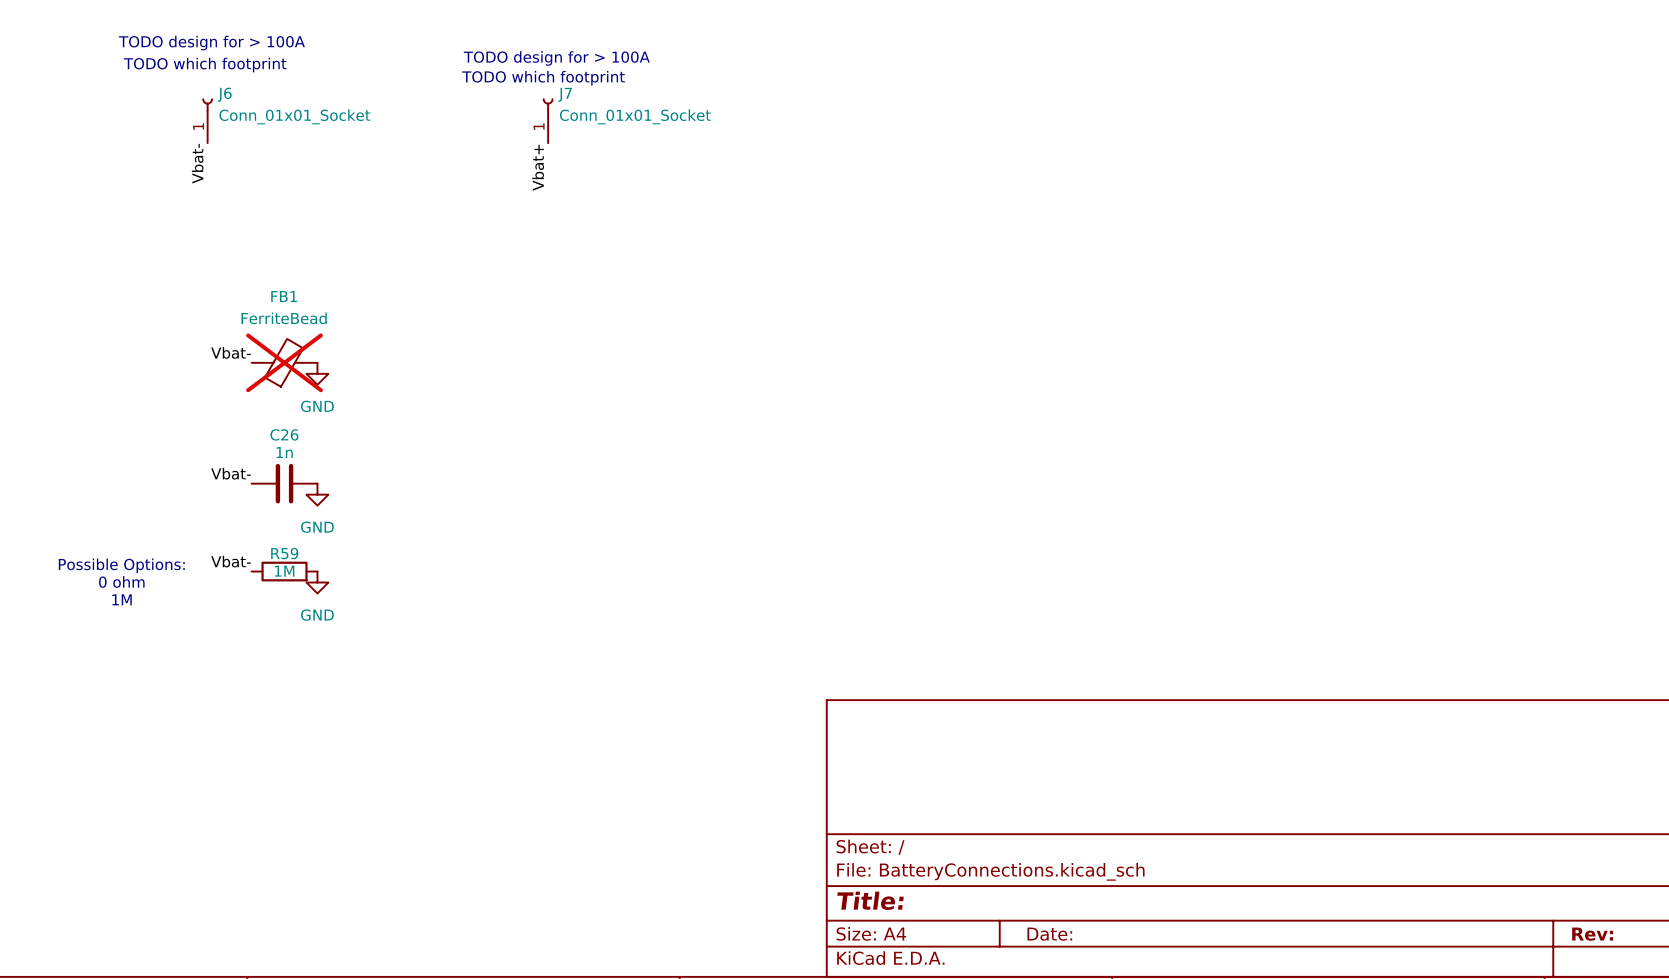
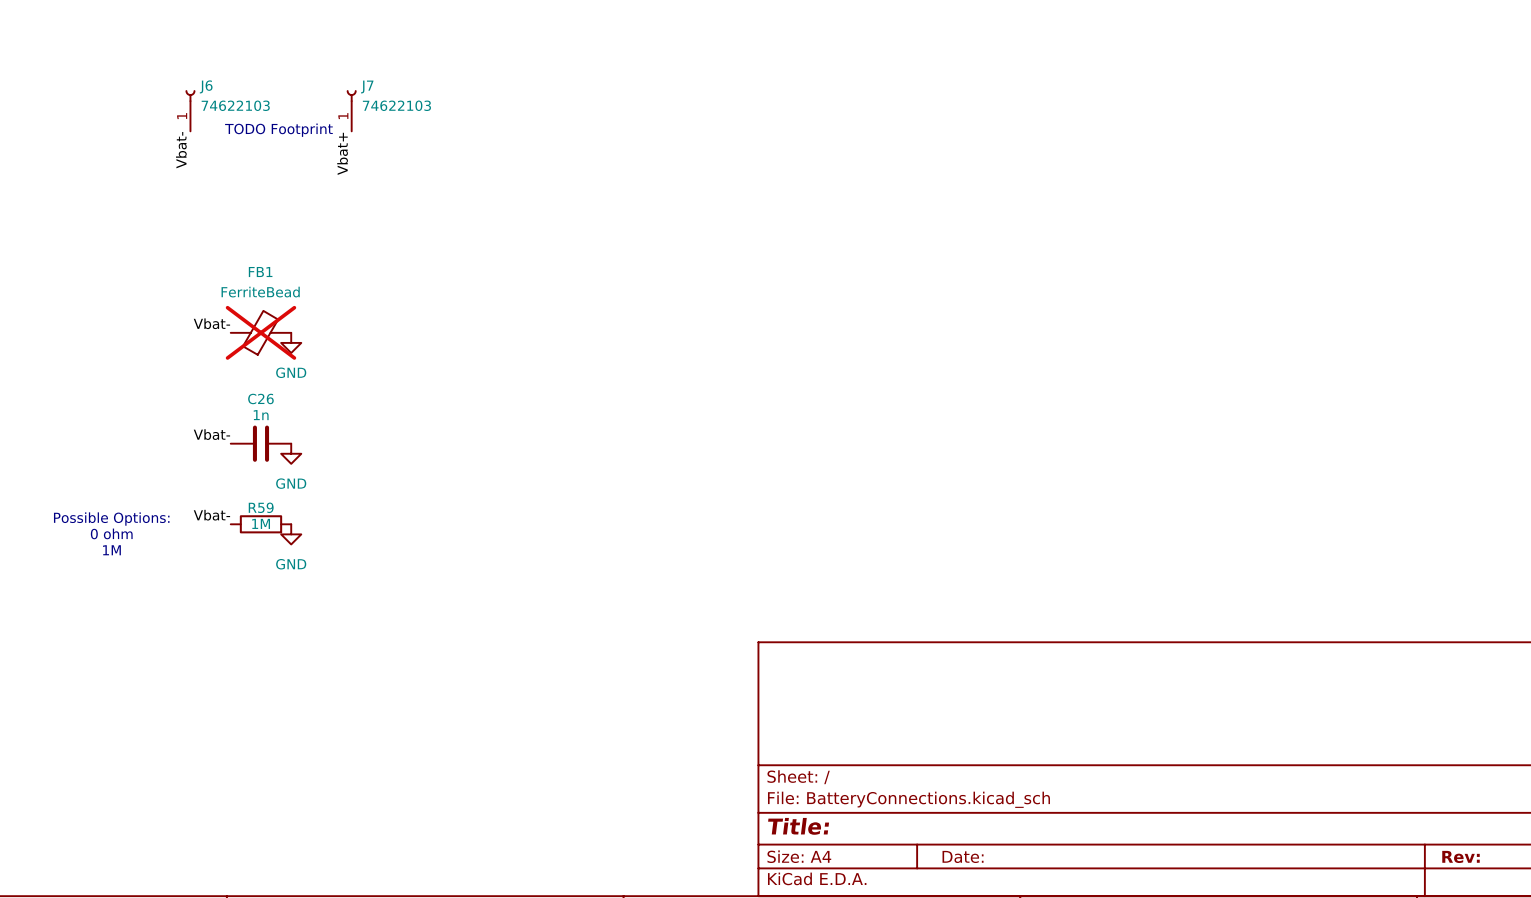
text: TODO design for > 100A (211, 43) -> none
text: TODO design for > 100A (556, 58) -> none
text: TODO which footprint (205, 65) -> none
text: TODO which footprint (543, 78) -> none
J6 value: Conn_01x01_Socket (294, 116) -> 74622103 (235, 105)
J7 value: Conn_01x01_Socket (635, 116) -> 74622103 (396, 105)
J7 position: (548, 120) -> (351, 110)
text: none -> TODO Footprint (278, 130)
label position: Vbat+ (538, 167) -> Vbat+ (342, 153)

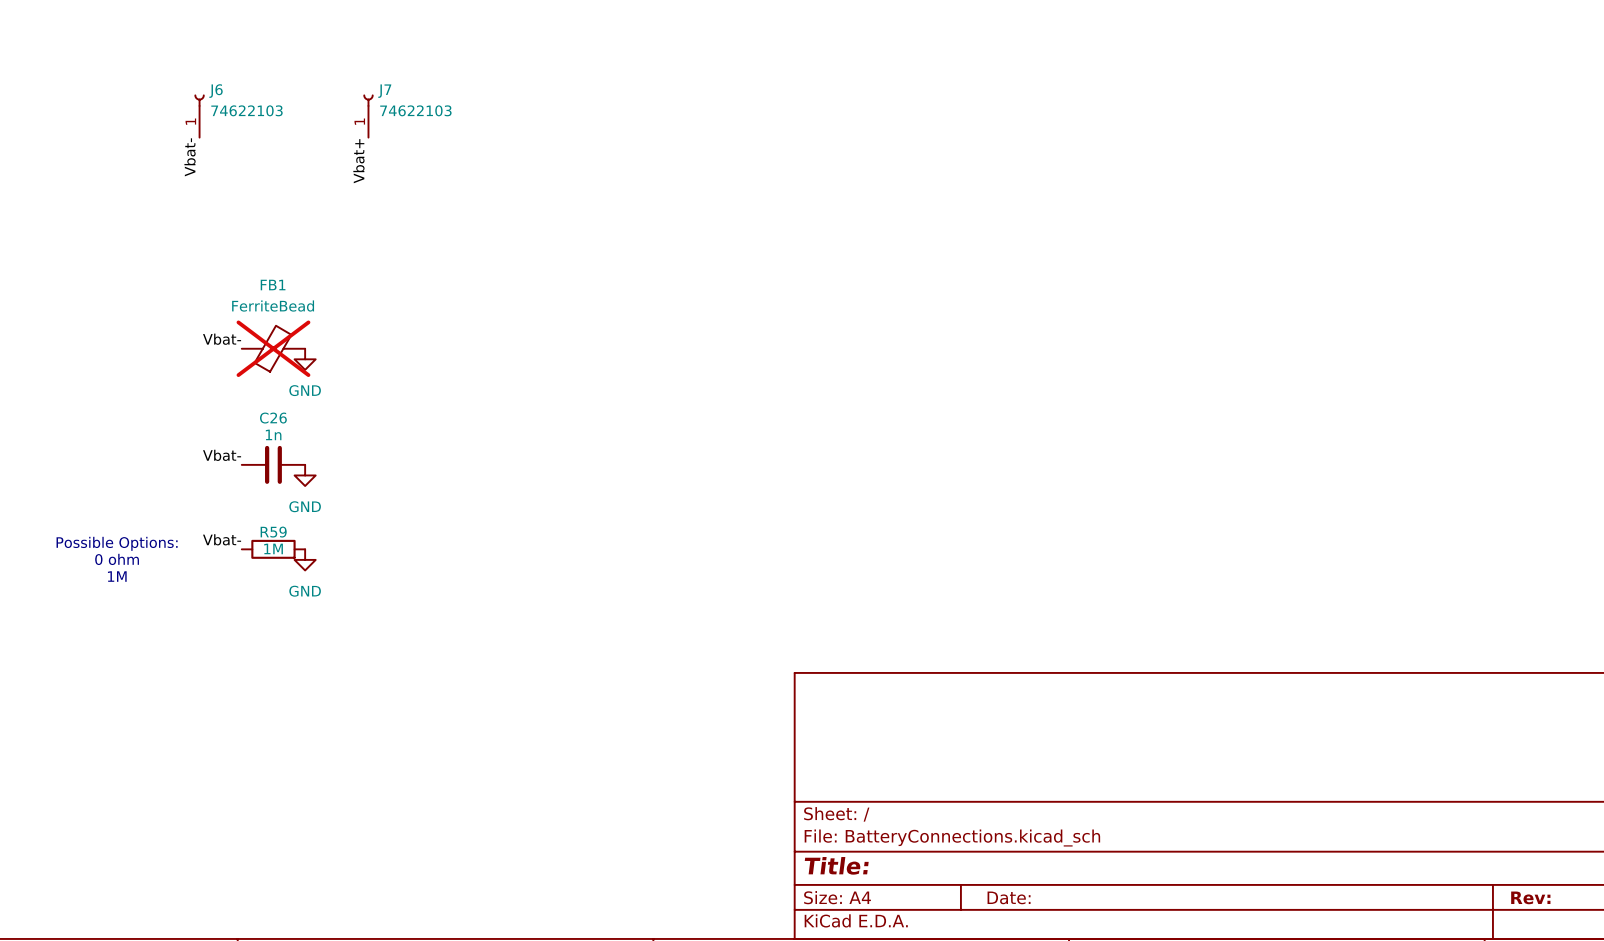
text: TODO Footprint (278, 130) -> none

